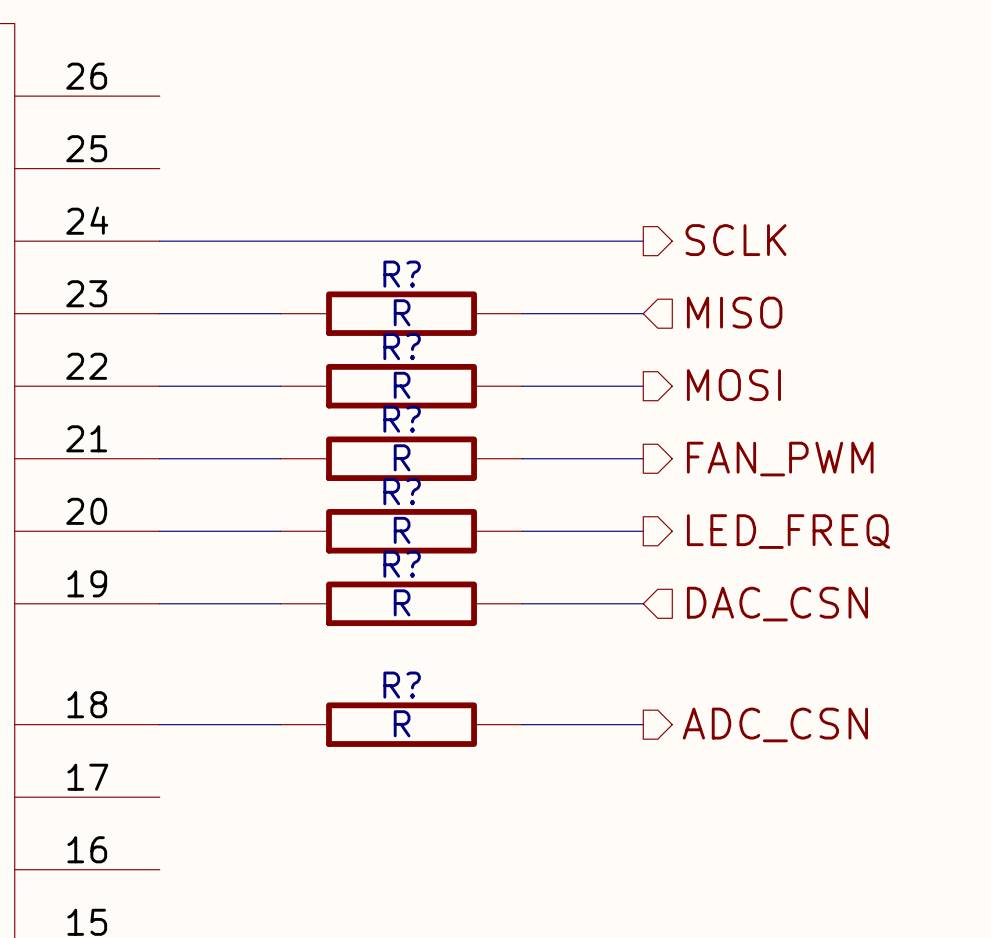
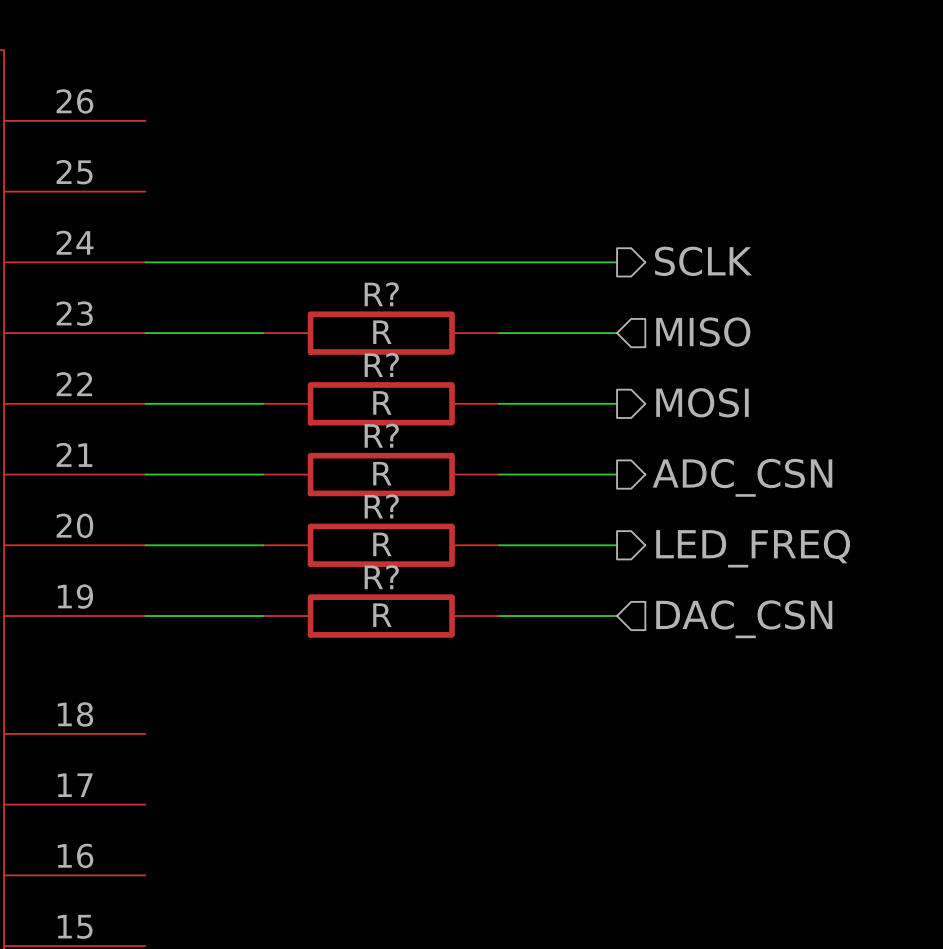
hierarchical label: FAN_PWM (780, 459) -> ADC_CSN (742, 477)
wire: (159, 724) (280, 724) -> none
R?: R (401, 724) -> none
wire: (522, 724) (643, 724) -> none
hierarchical label: ADC_CSN (775, 724) -> none

